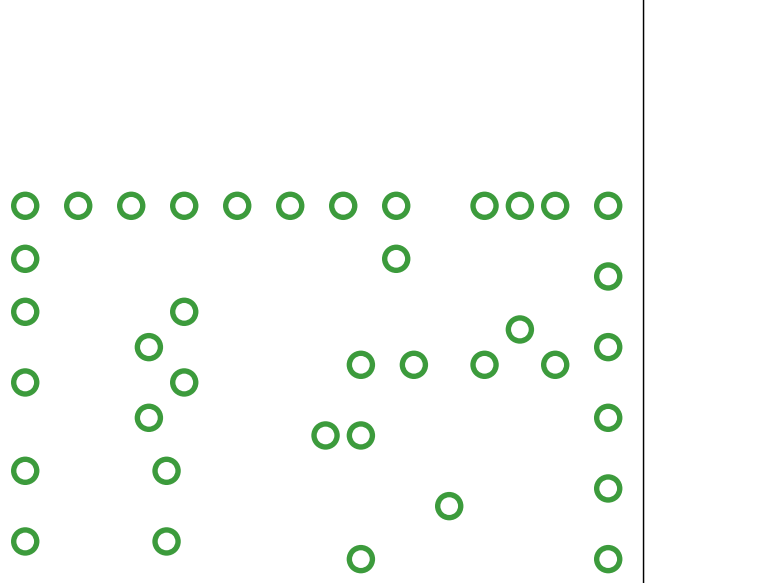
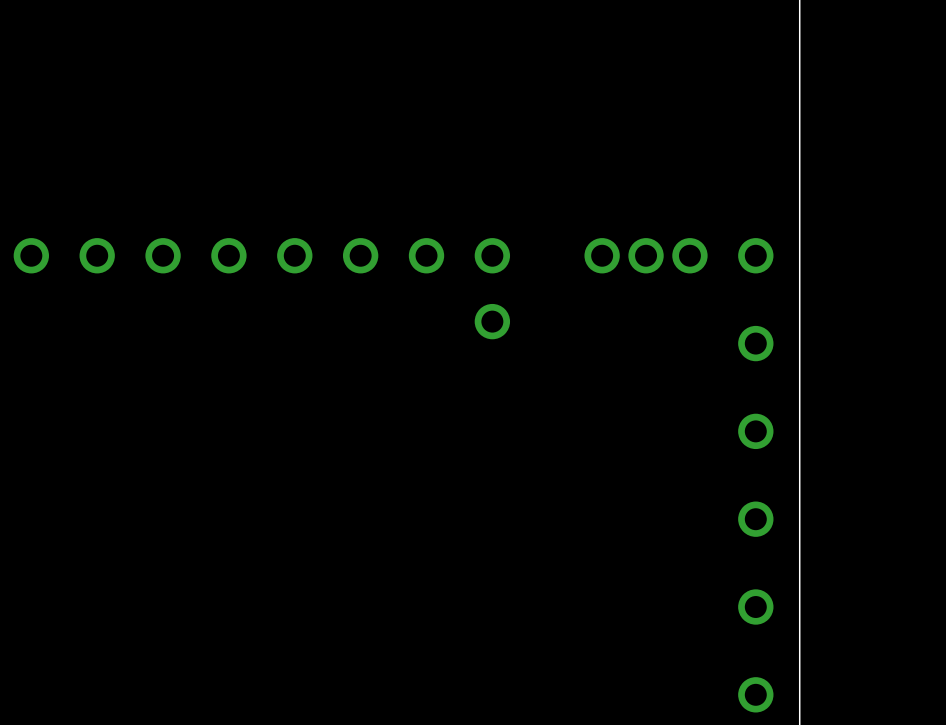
via: (25, 258) -> none
via: (25, 311) -> none
via: (184, 311) -> none
via: (519, 329) -> none
via: (148, 347) -> none
via: (360, 364) -> none
via: (413, 364) -> none
via: (484, 364) -> none
via: (555, 364) -> none
via: (25, 382) -> none
via: (184, 382) -> none
via: (148, 417) -> none
via: (325, 435) -> none
via: (360, 435) -> none
via: (25, 470) -> none
via: (166, 470) -> none
via: (449, 506) -> none
via: (25, 541) -> none
via: (166, 541) -> none
via: (360, 559) -> none

